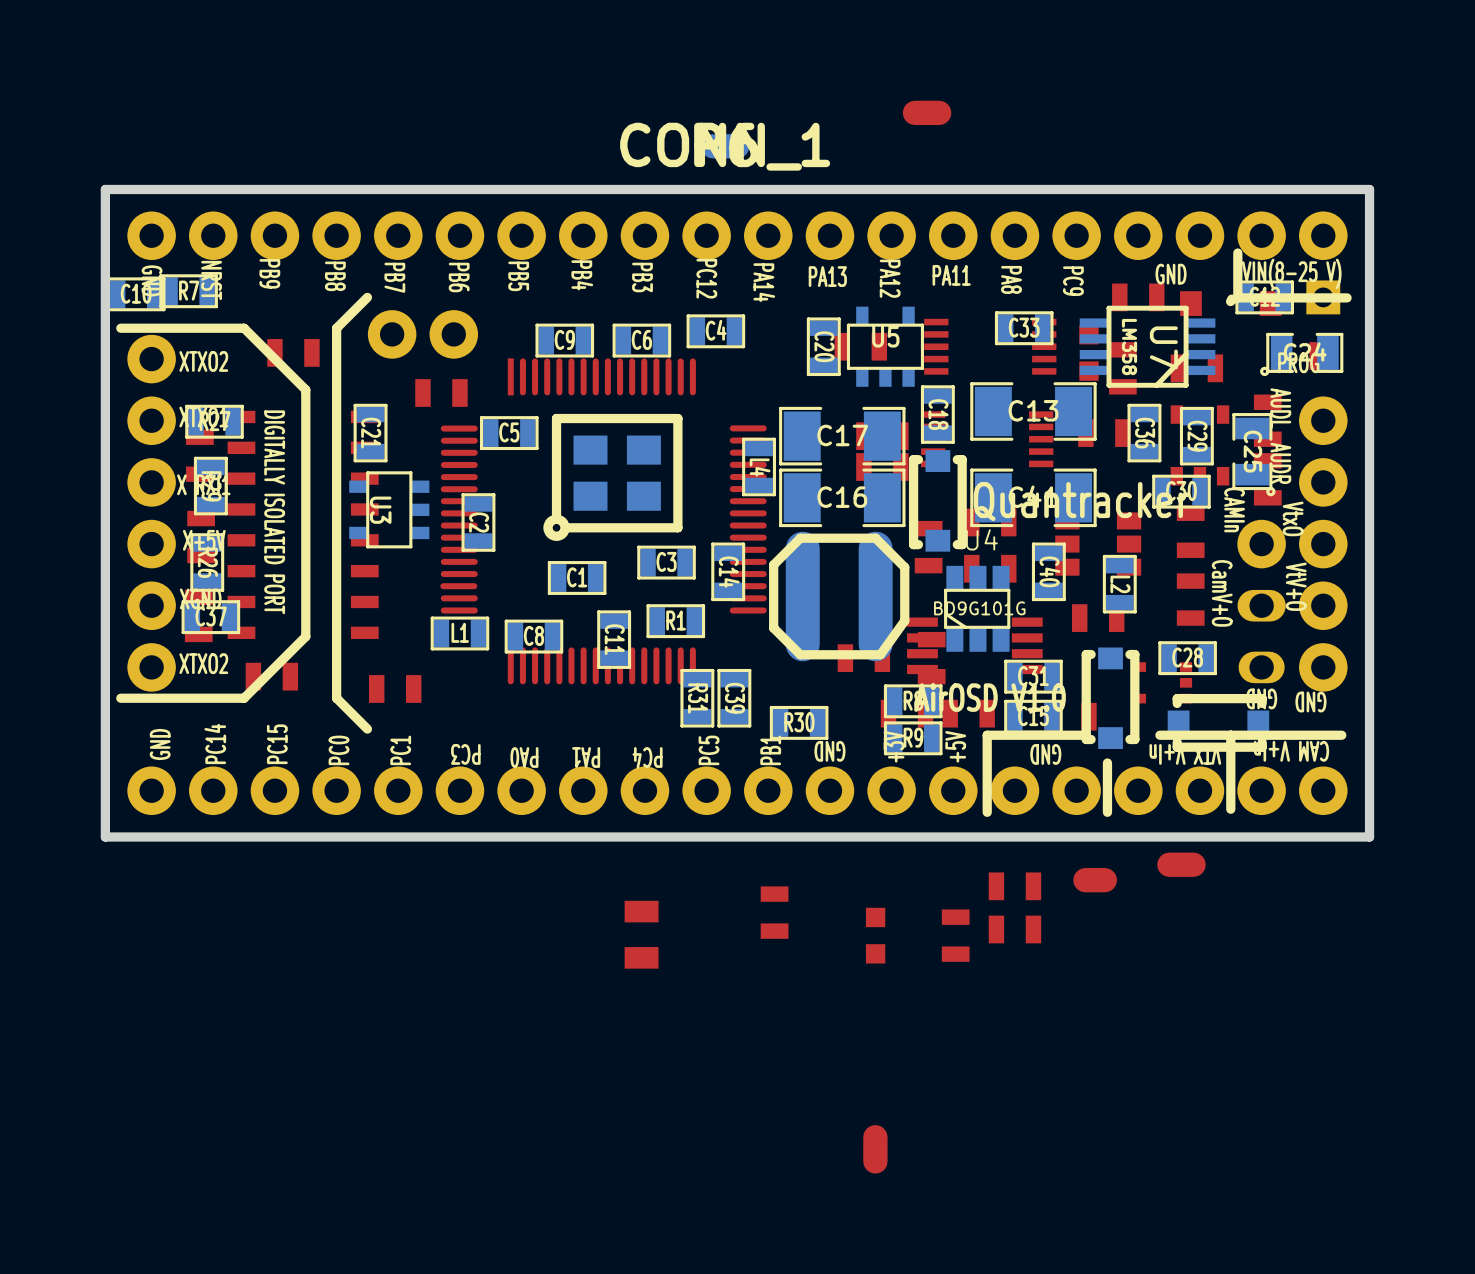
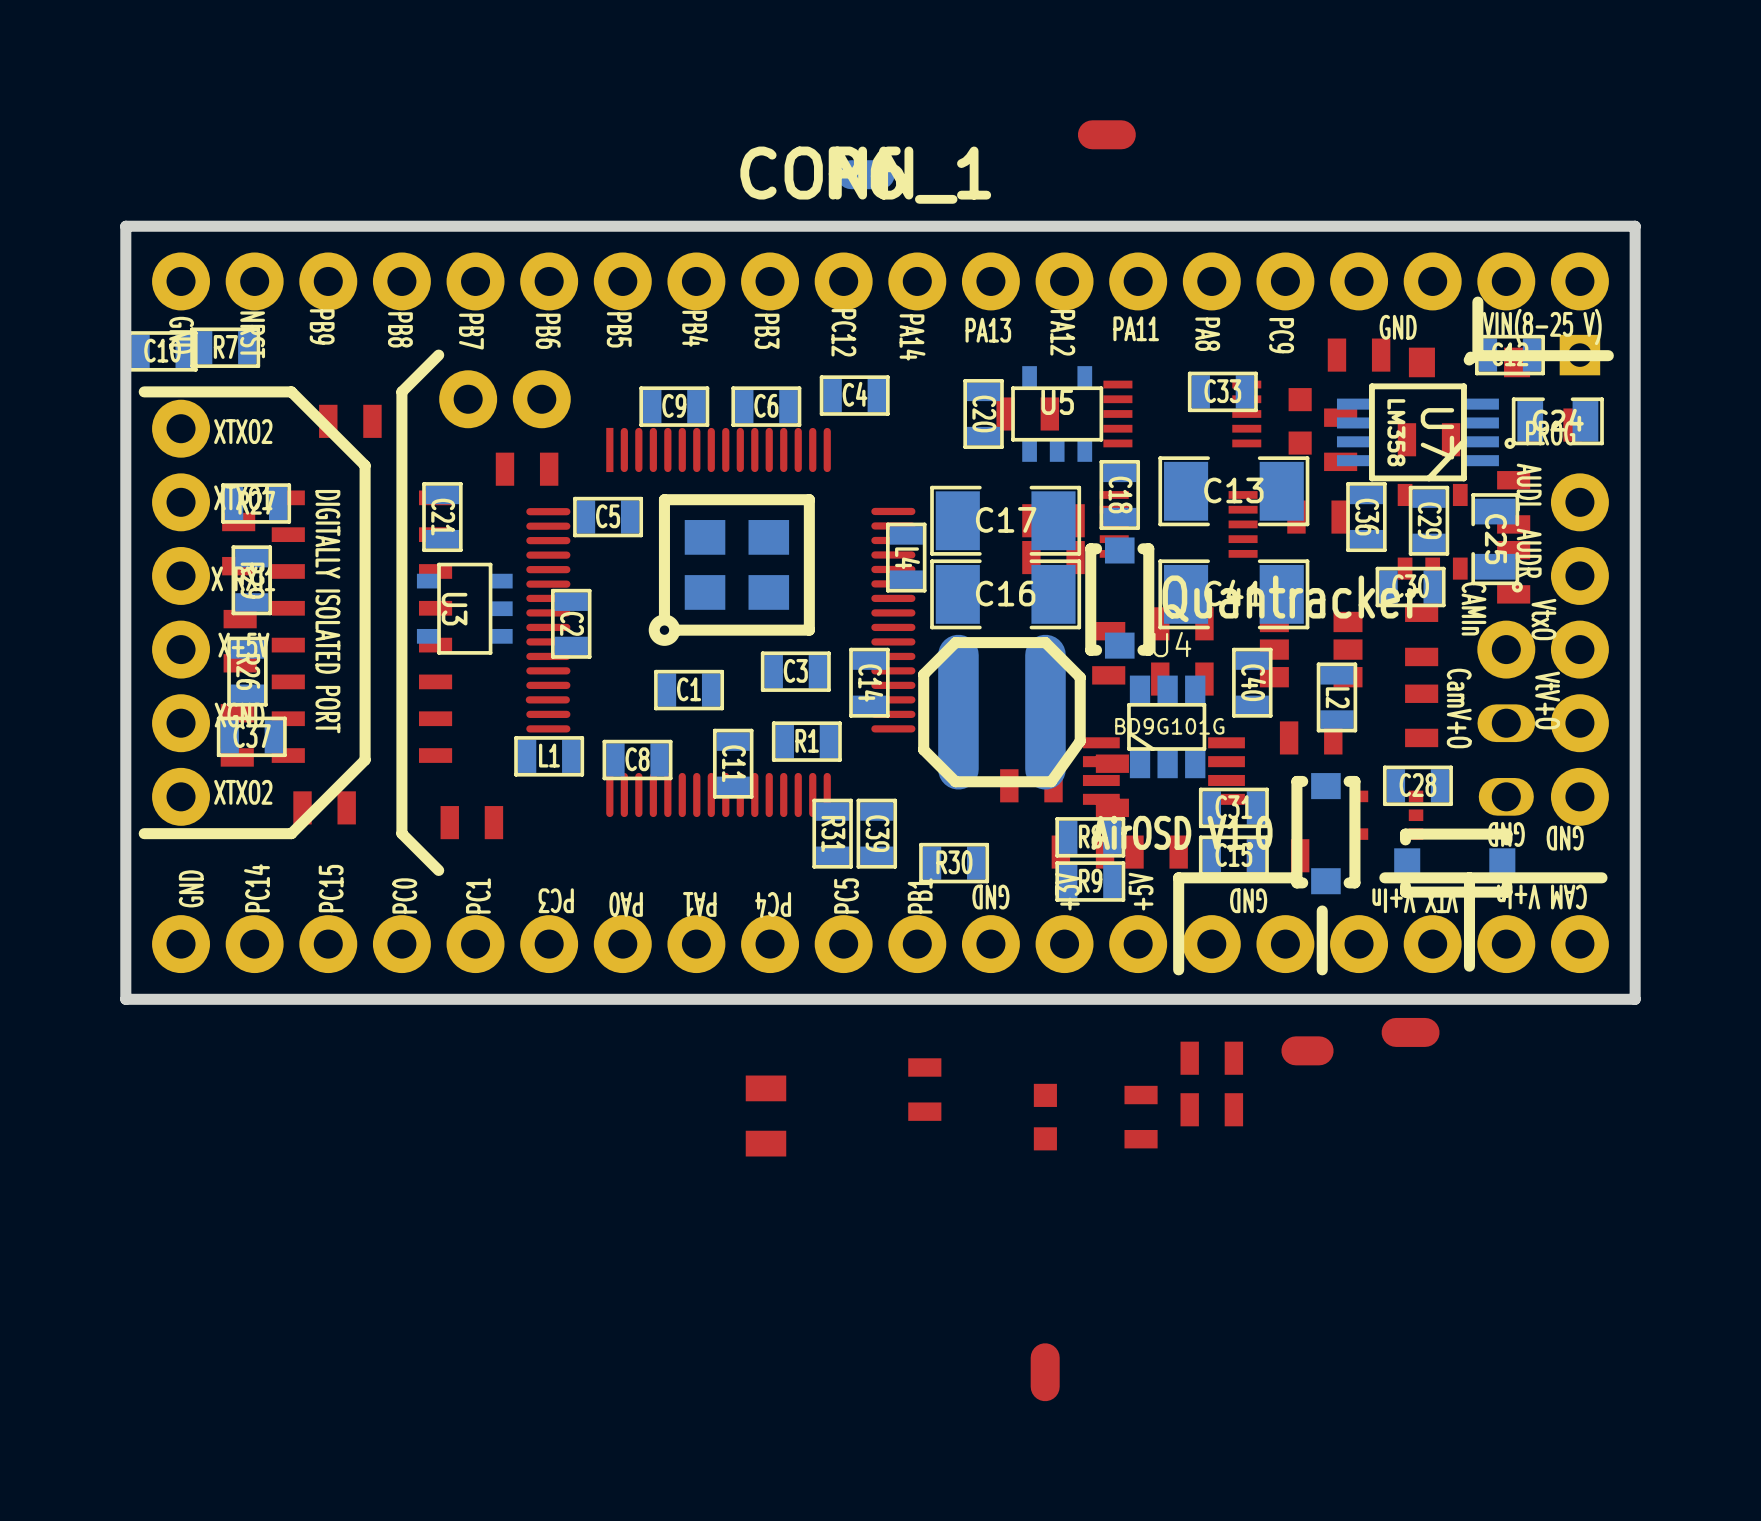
U7 position: (1147, 346) -> (1417, 432)

